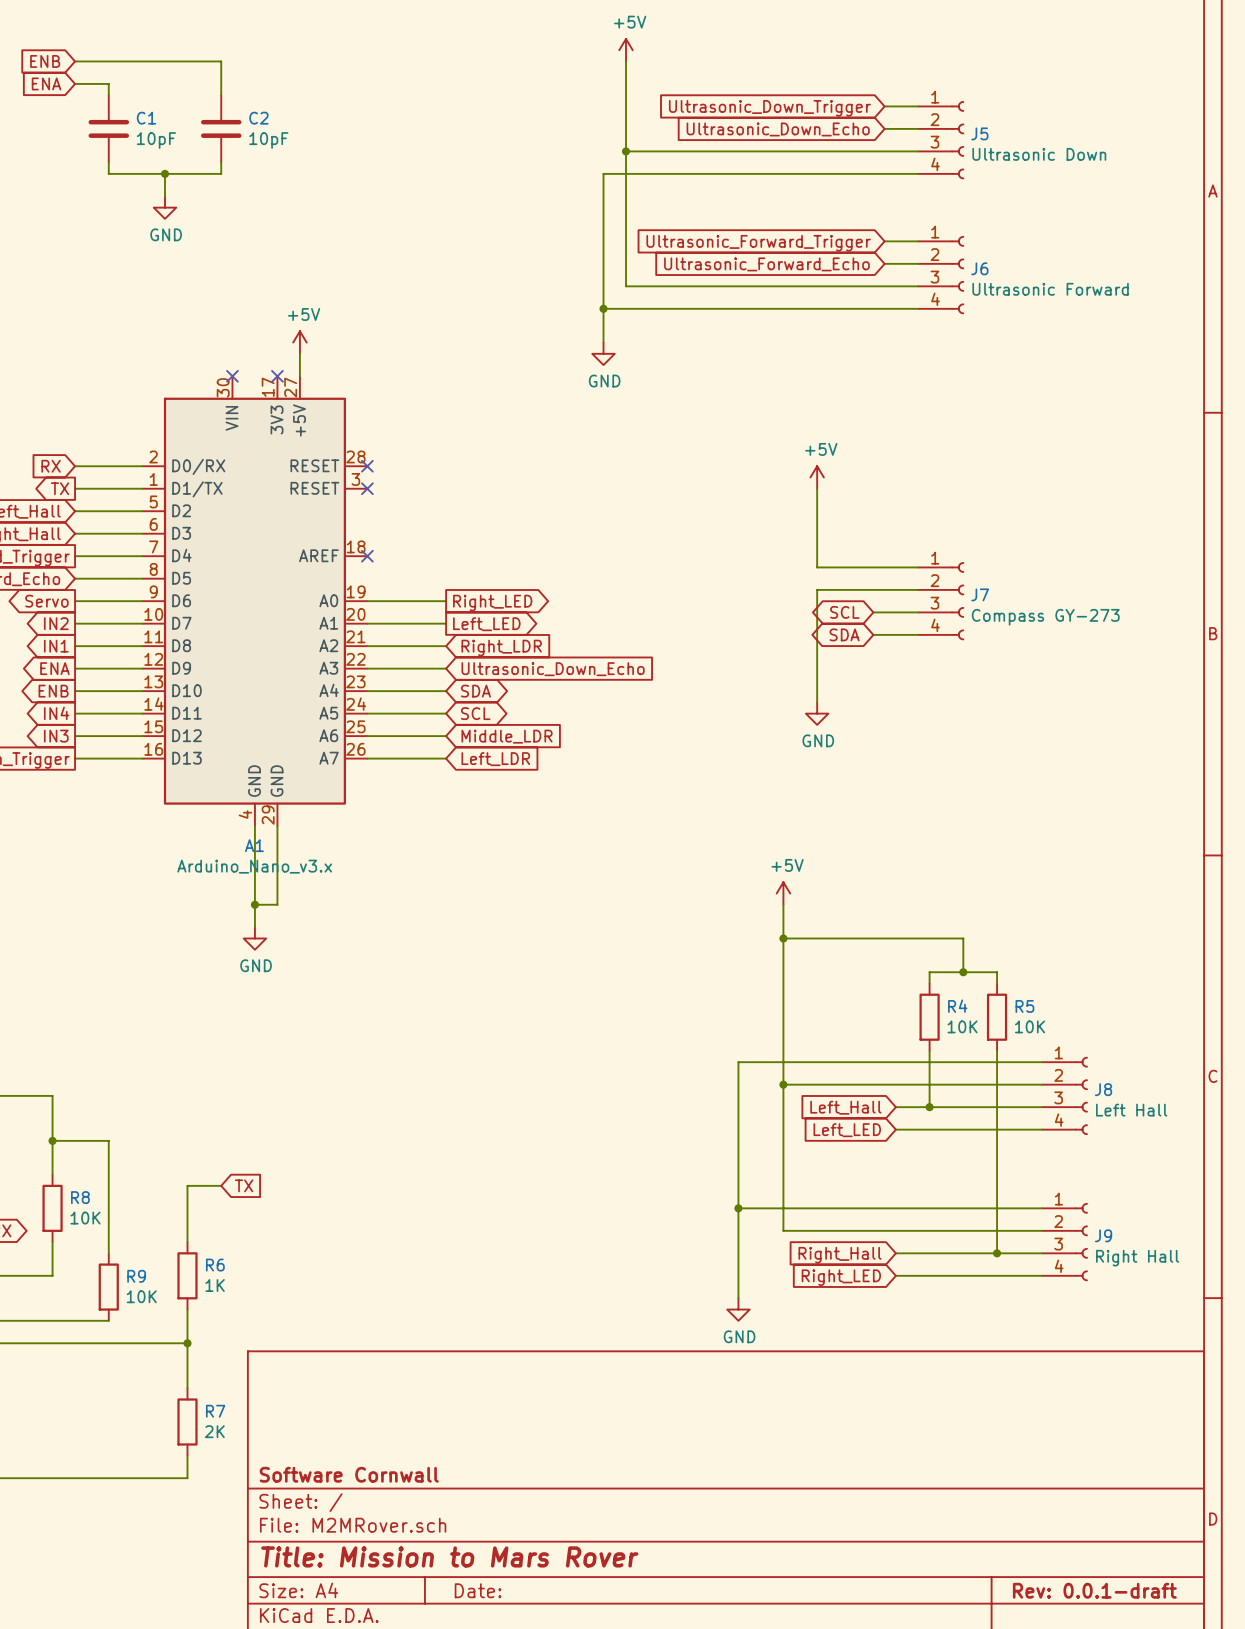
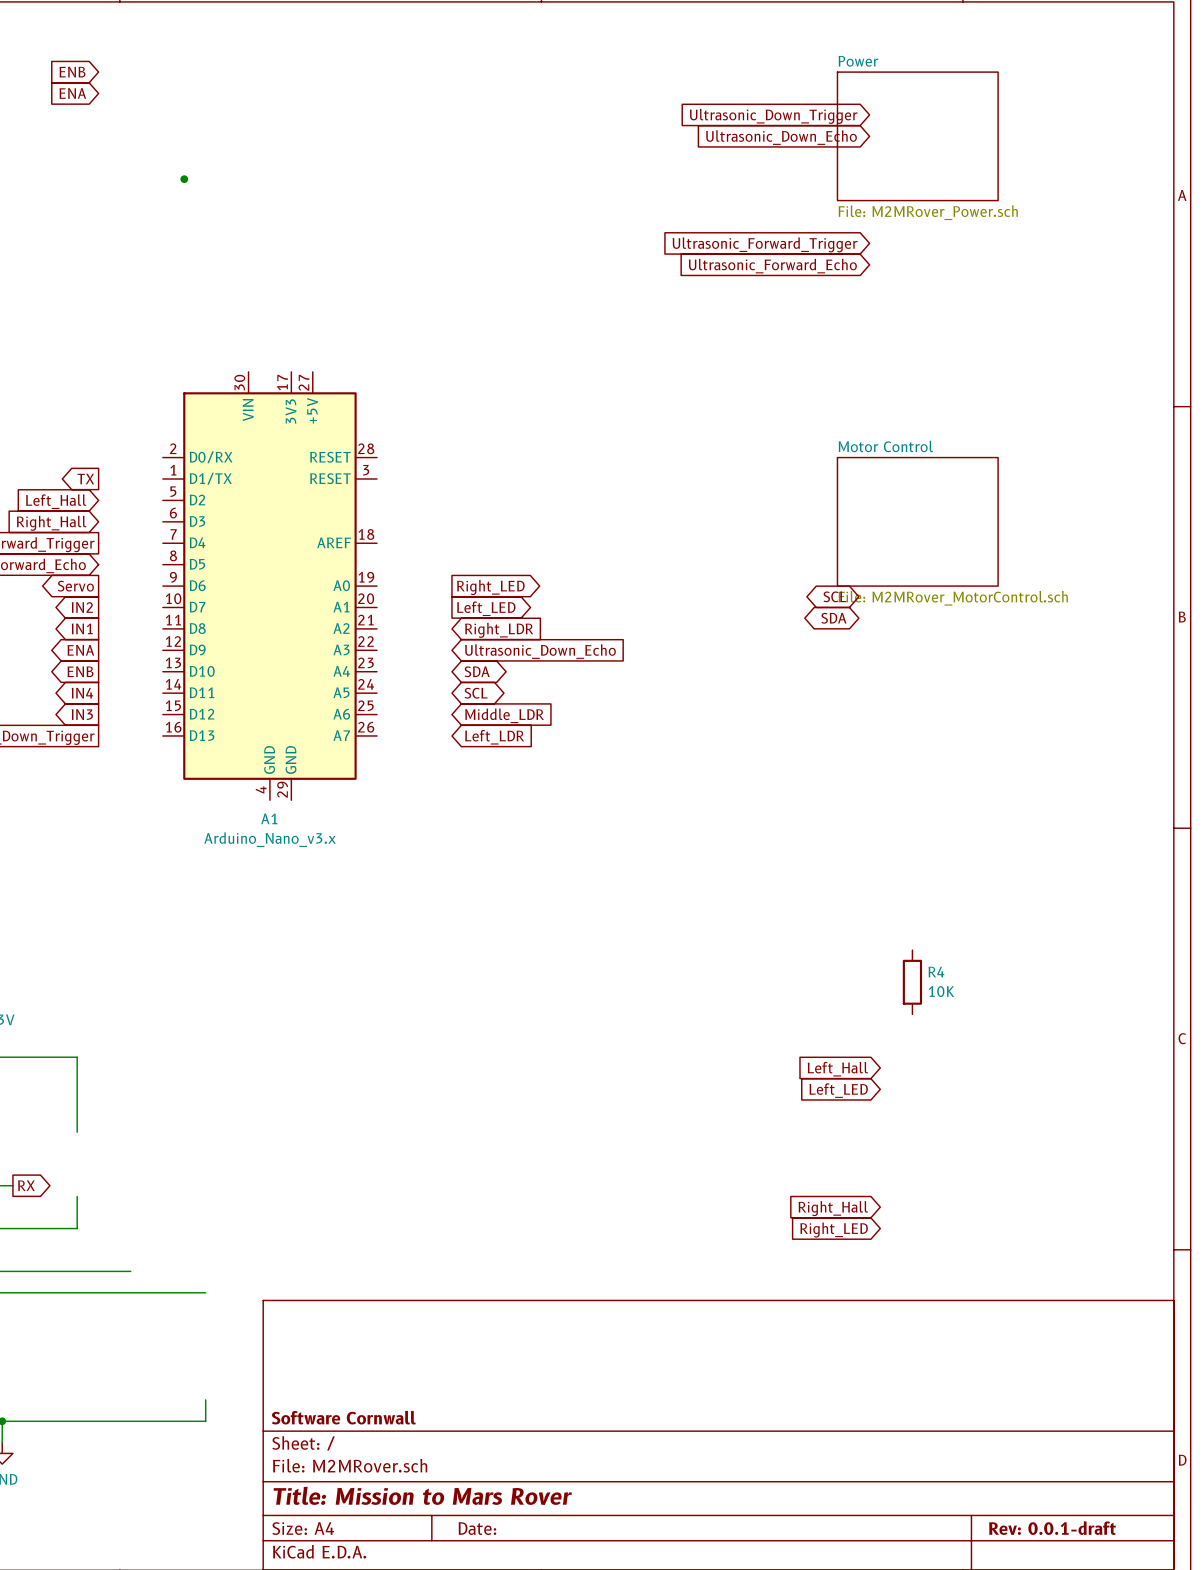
power symbol: +5V (626, 50) -> none
wire: (75, 61) (221, 61) (221, 95) -> none
wire: (626, 61) (626, 286) (918, 286) -> none
wire: (75, 83) (108, 83) (108, 95) -> none
wire: (884, 106) (918, 106) -> none
C1: 10pF (108, 128) -> none
C2: 10pF (221, 128) -> none
wire: (884, 128) (918, 128) -> none
sheet Power: none -> File: M2MRover_Power.sch (917, 136)
J5: Ultrasonic Down (941, 140) -> none
wire: (626, 151) (918, 151) -> none
junction: (626, 151) -> none
wire: (108, 162) (108, 173) (221, 173) (221, 162) -> none
wire: (164, 173) (164, 196) -> none
wire: (918, 173) (603, 173) (603, 342) -> none
power symbol: GND (164, 207) -> none
wire: (884, 241) (918, 241) -> none
wire: (884, 263) (918, 263) -> none
J6: Ultrasonic Forward (941, 275) -> none
wire: (603, 308) (918, 308) -> none
junction: (603, 308) -> none
power symbol: +5V (299, 342) -> none
wire: (299, 353) (299, 376) -> none
power symbol: GND (603, 353) -> none
no-connect mark: (232, 376) -> none
no-connect mark: (277, 376) -> none
global label: RX (51, 466) -> none
wire: (75, 466) (142, 466) -> none
no-connect mark: (367, 466) -> none
power symbol: +5V (817, 477) -> none
wire: (75, 488) (142, 488) -> none
no-connect mark: (367, 488) -> none
wire: (817, 488) (817, 567) (918, 567) -> none
wire: (75, 511) (142, 511) -> none
wire: (75, 533) (142, 533) -> none
sheet Motor Control: none -> File: M2MRover_MotorControl.sch (917, 521)
wire: (75, 556) (142, 556) -> none
no-connect mark: (367, 556) -> none
wire: (75, 578) (142, 578) -> none
wire: (918, 589) (817, 589) (817, 702) -> none
wire: (75, 601) (142, 601) -> none
wire: (367, 601) (446, 601) -> none
J7: Compass GY-273 (941, 601) -> none
wire: (873, 612) (918, 612) -> none
wire: (75, 623) (142, 623) -> none
wire: (367, 623) (446, 623) -> none
wire: (873, 634) (918, 634) -> none
wire: (75, 646) (142, 646) -> none
wire: (367, 646) (446, 646) -> none
wire: (75, 668) (142, 668) -> none
wire: (367, 668) (446, 668) -> none
wire: (75, 691) (142, 691) -> none
wire: (367, 691) (446, 691) -> none
wire: (75, 713) (142, 713) -> none
wire: (367, 713) (446, 713) -> none
power symbol: GND (817, 713) -> none
wire: (75, 736) (142, 736) -> none
wire: (367, 736) (446, 736) -> none
wire: (75, 758) (142, 758) -> none
wire: (367, 758) (446, 758) -> none
wire: (254, 826) (254, 927) -> none
wire: (277, 826) (277, 904) (254, 904) -> none
power symbol: +5V (783, 893) -> none
junction: (254, 904) -> none
wire: (783, 904) (783, 1230) (1042, 1230) -> none
power symbol: GND (254, 938) -> none
wire: (783, 938) (963, 938) (963, 972) -> none
junction: (783, 938) -> none
junction: (963, 972) -> none
wire: (929, 983) (929, 972) (997, 972) (997, 983) -> none
R5: 10K (997, 1017) -> none
wire: (929, 1050) (929, 1107) -> none
wire: (997, 1050) (997, 1253) -> none
wire: (1042, 1062) (738, 1062) (738, 1298) -> none
wire: (783, 1084) (1042, 1084) -> none
junction: (783, 1084) -> none
J8: Left Hall (1064, 1095) -> none
wire: (895, 1107) (1042, 1107) -> none
junction: (929, 1107) -> none
wire: (895, 1129) (1042, 1129) -> none
wire: (52, 1140) (108, 1140) (108, 1253) -> none
junction: (52, 1140) -> none
wire: (221, 1185) (187, 1185) (187, 1242) -> none
global label: TX (244, 1185) -> none
R8: 10K (52, 1208) -> none
wire: (738, 1208) (1042, 1208) -> none
junction: (738, 1208) -> none
J9: Right Hall (1064, 1242) -> none
wire: (895, 1253) (1042, 1253) -> none
junction: (997, 1253) -> none
R6: 1K (187, 1275) -> none
wire: (895, 1275) (1042, 1275) -> none
R9: 10K (108, 1287) -> none
wire: (187, 1309) (187, 1388) -> none
power symbol: GND (738, 1309) -> none
junction: (187, 1343) -> none
R7: 2K (187, 1421) -> none

